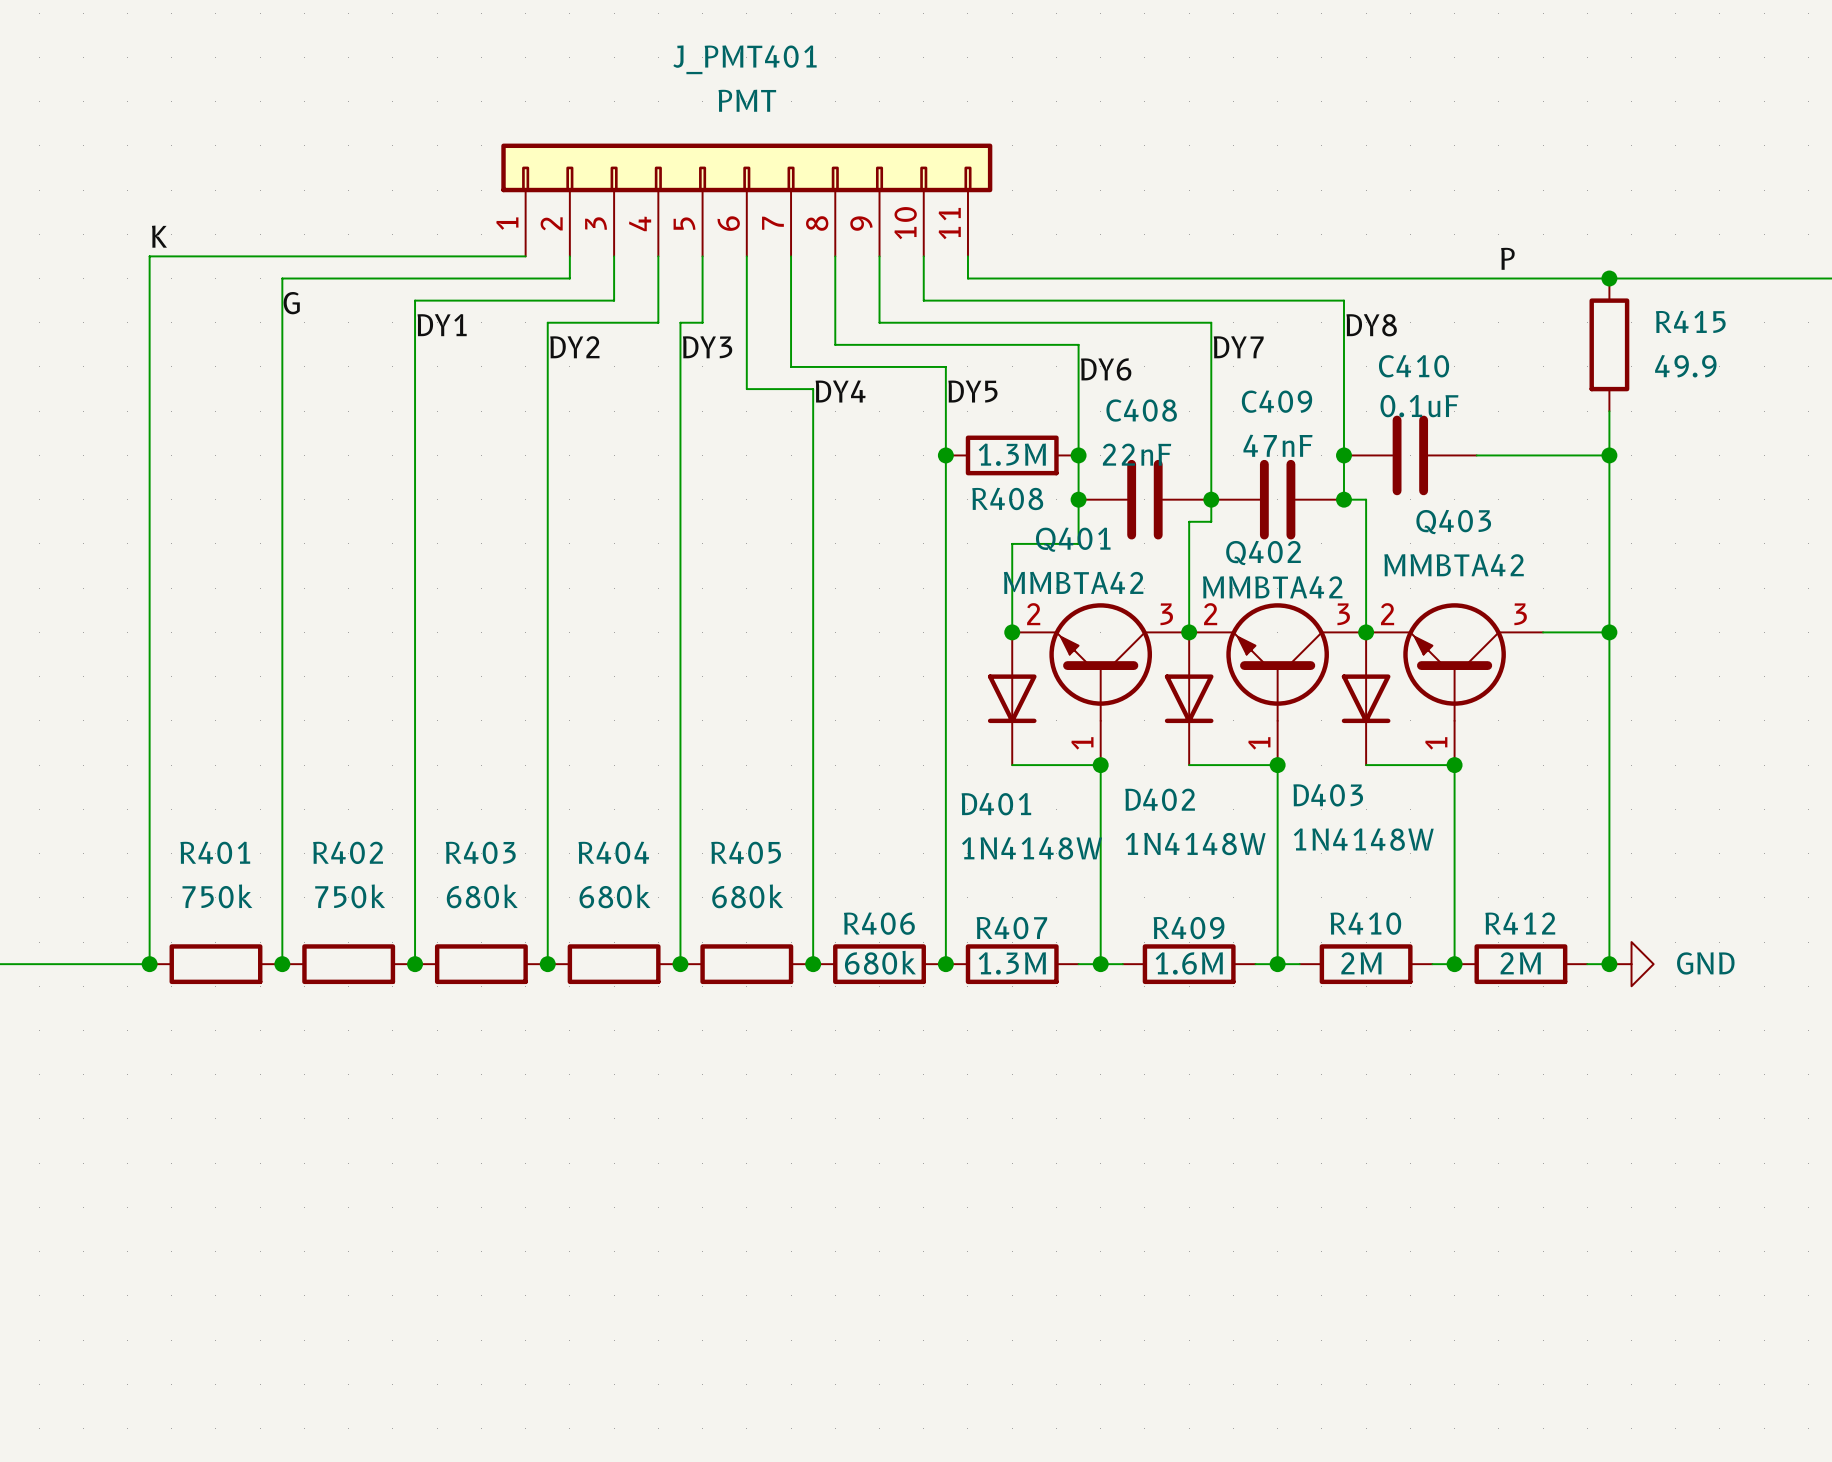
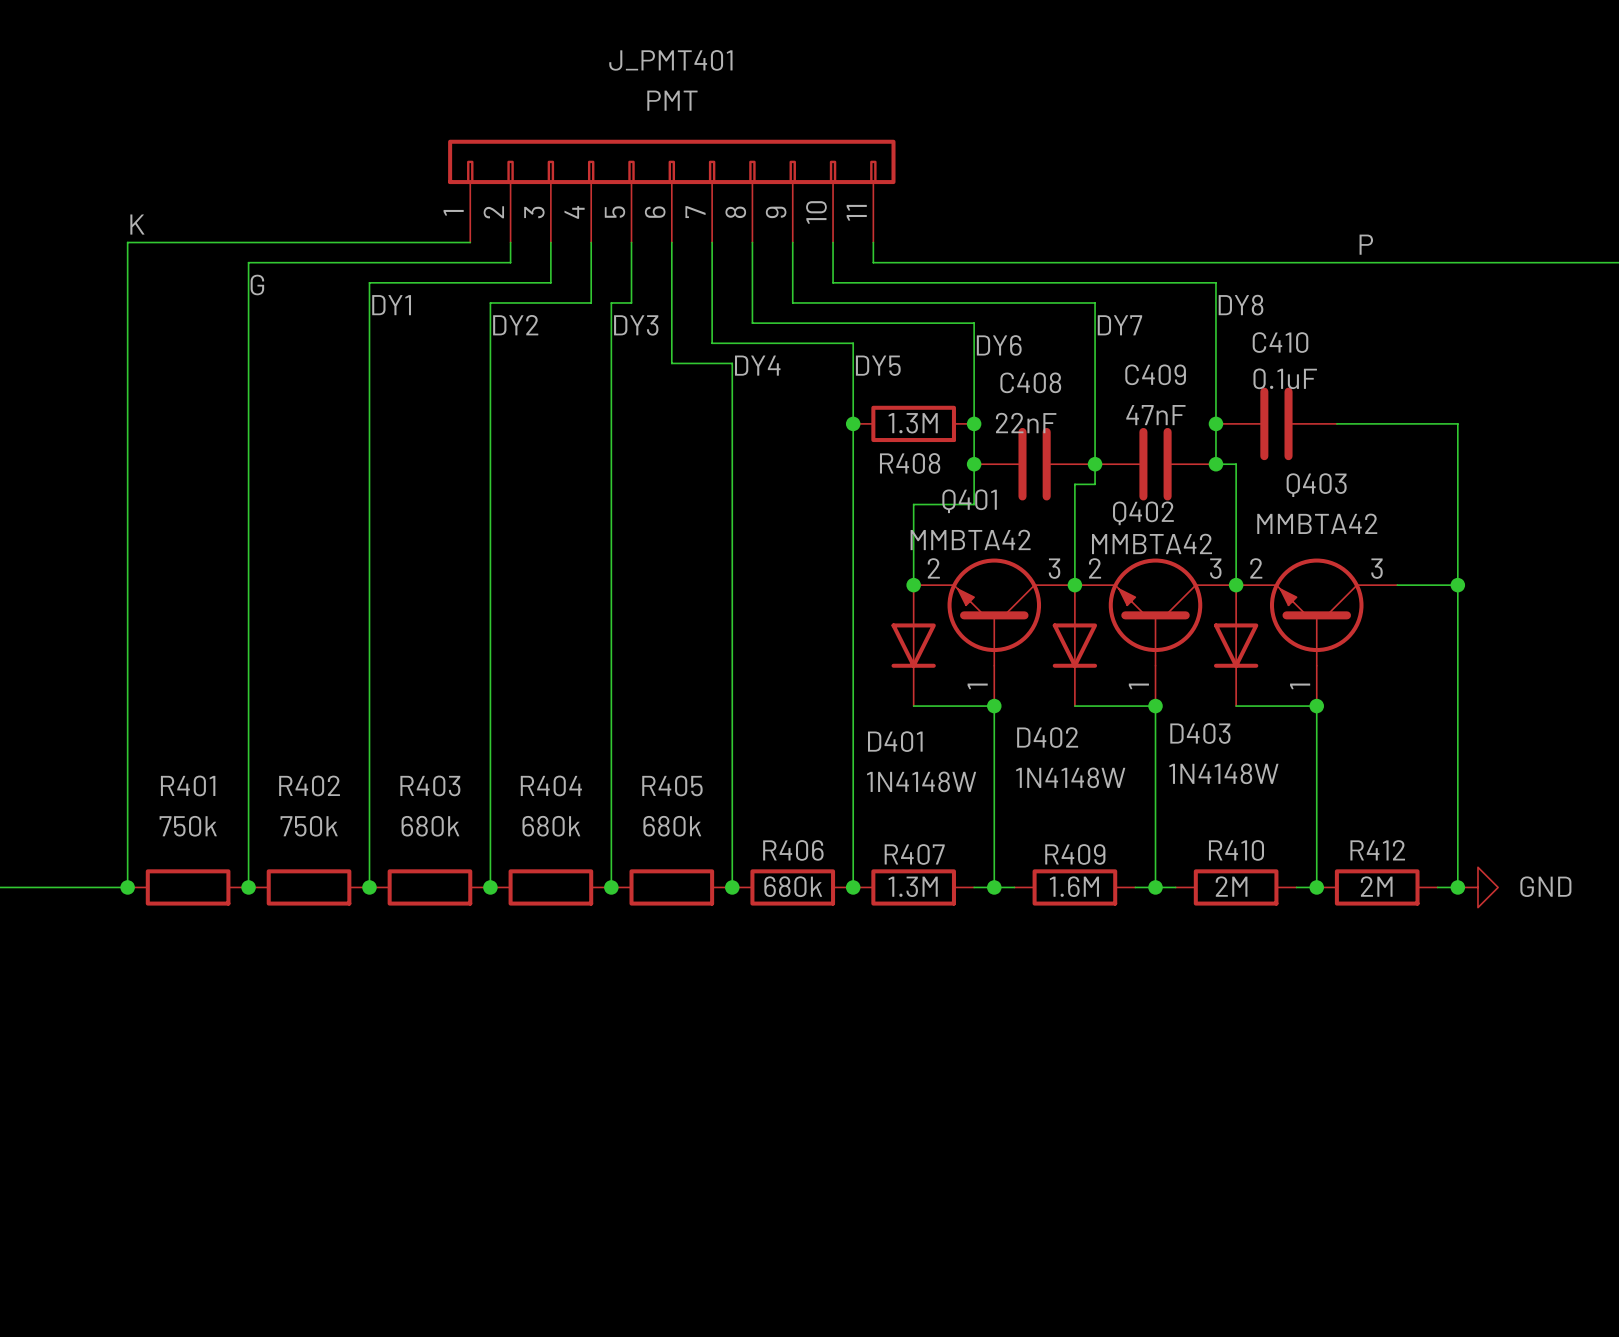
junction: (1609, 278) -> none
R415: 49.9 (1609, 344) -> none
wire: (1609, 411) (1609, 455) -> none
junction: (1609, 455) -> none

